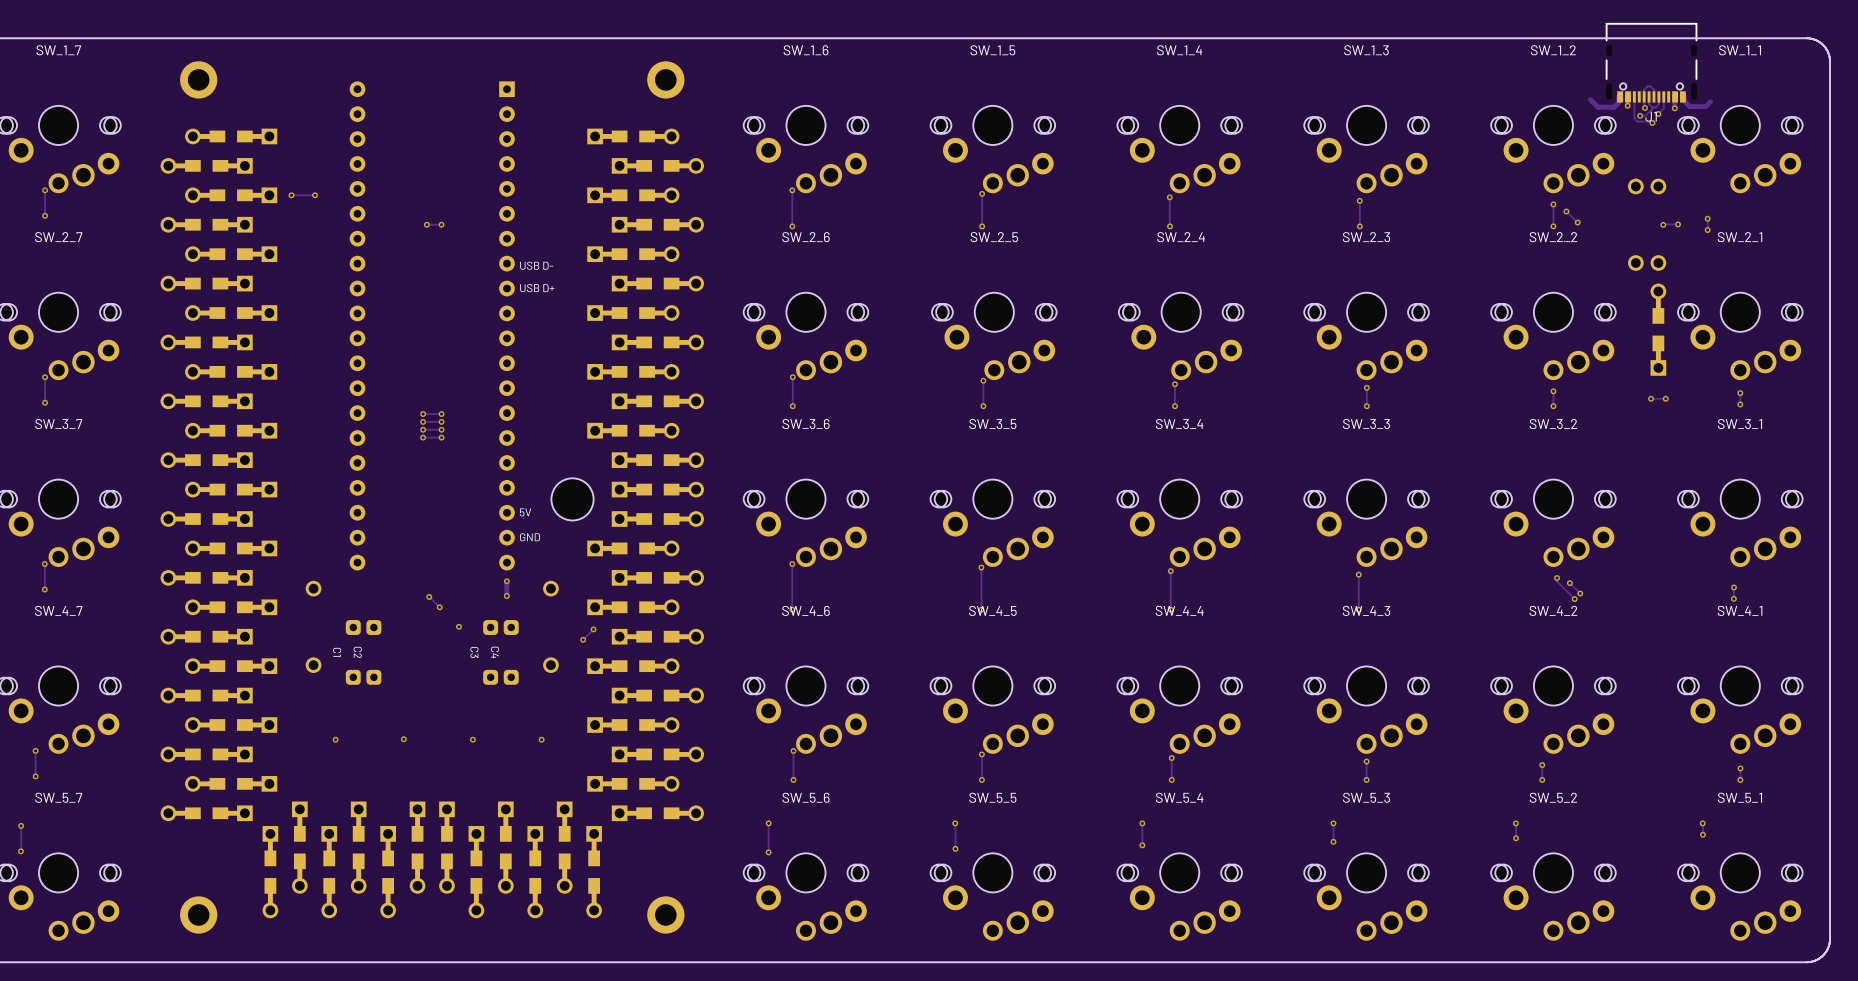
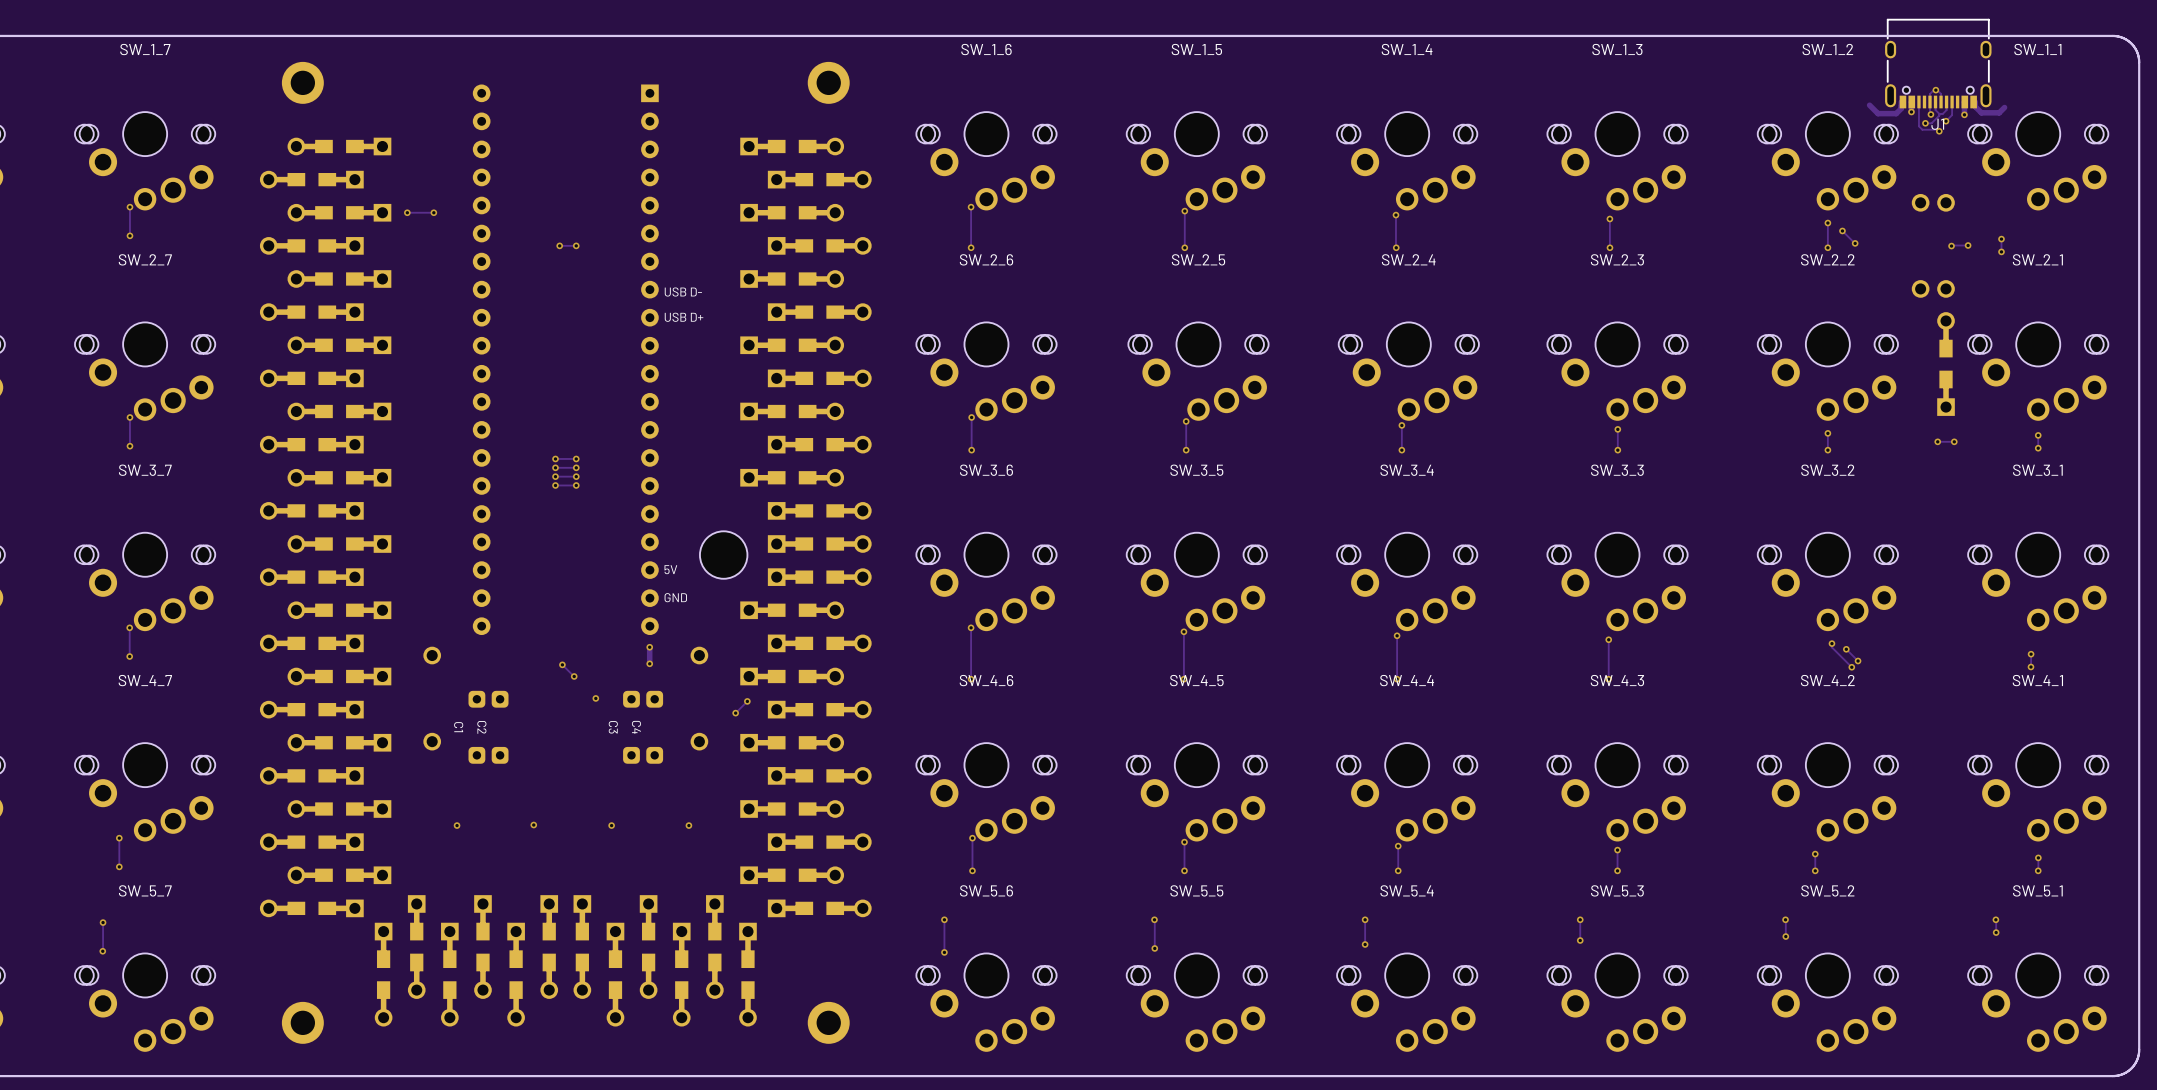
J1 footprint: [1606, 23, 1698, 103] -> [1885, 19, 1992, 109]
via: none -> (1935, 90)

